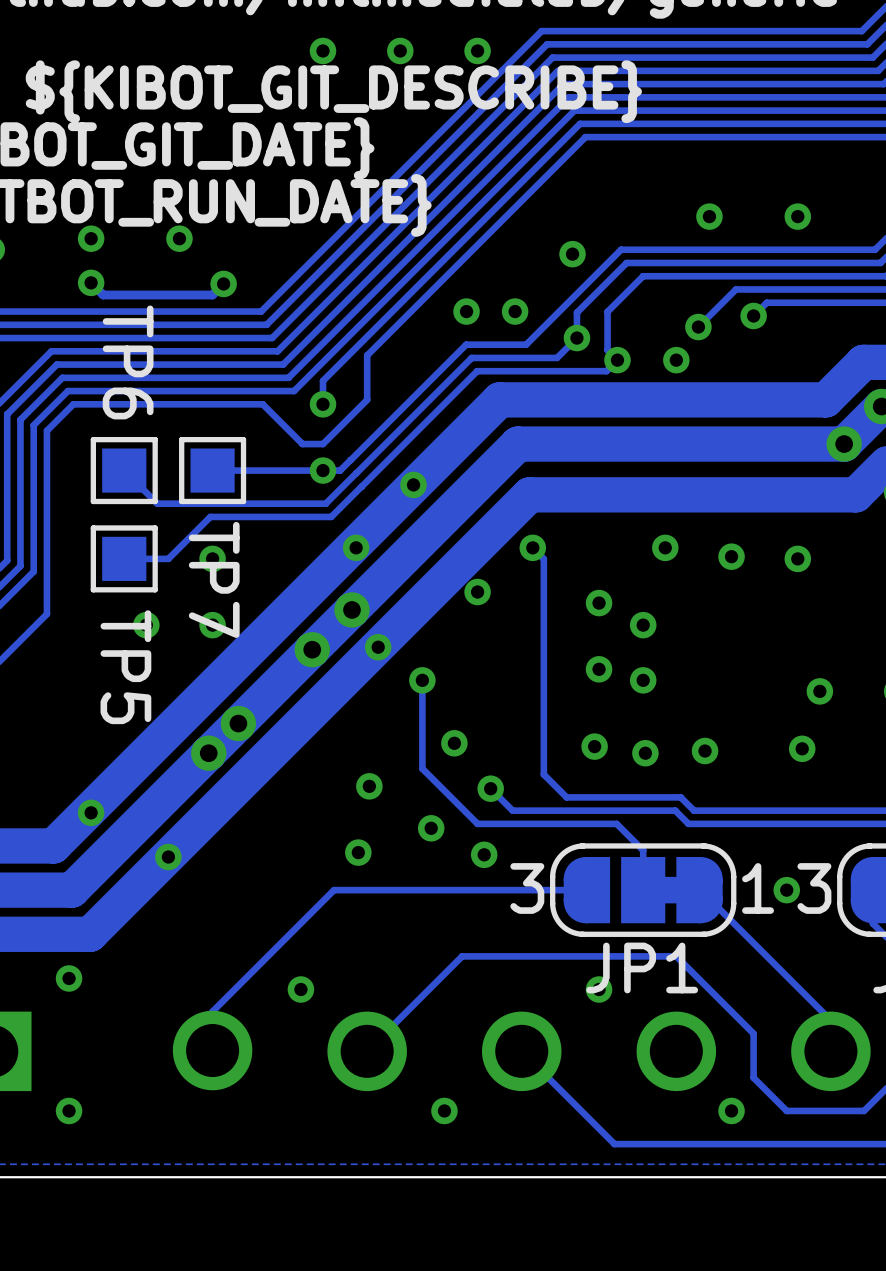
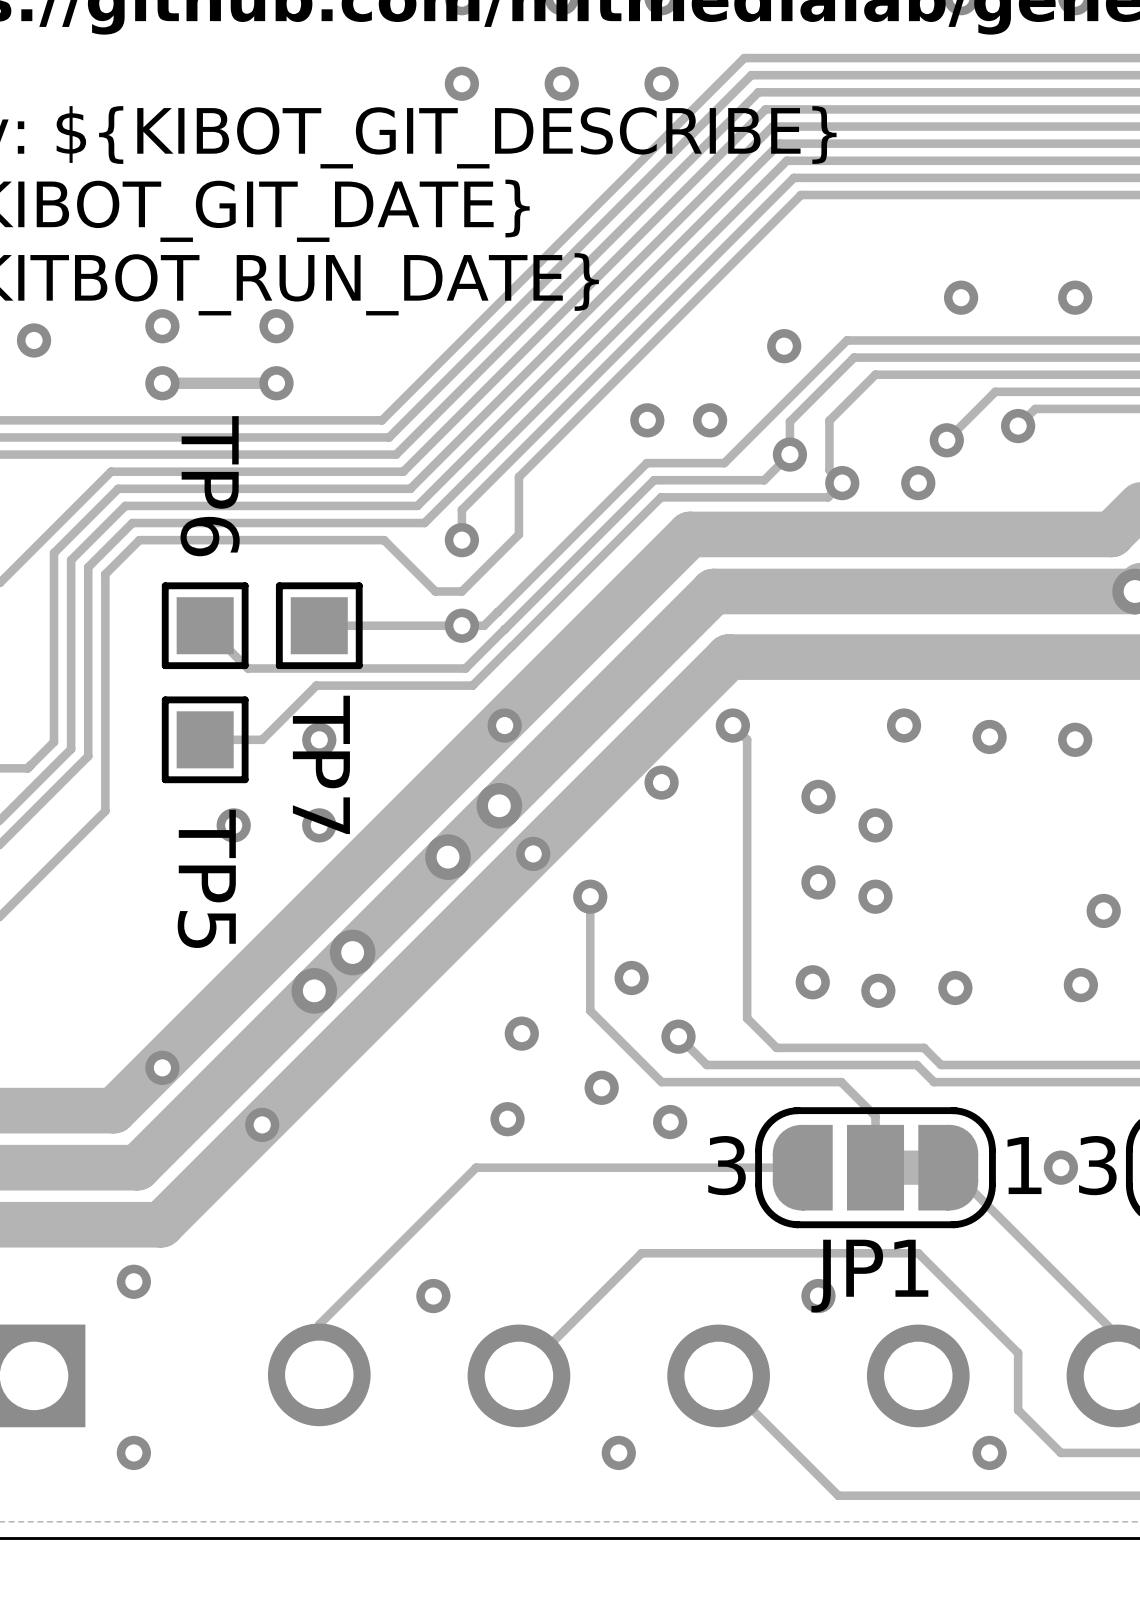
track: (91, 282) (103, 295) (212, 295) (223, 283) -> (162, 383) (276, 383)
via position: (223, 283) -> (276, 383)
via: (413, 484) -> none

